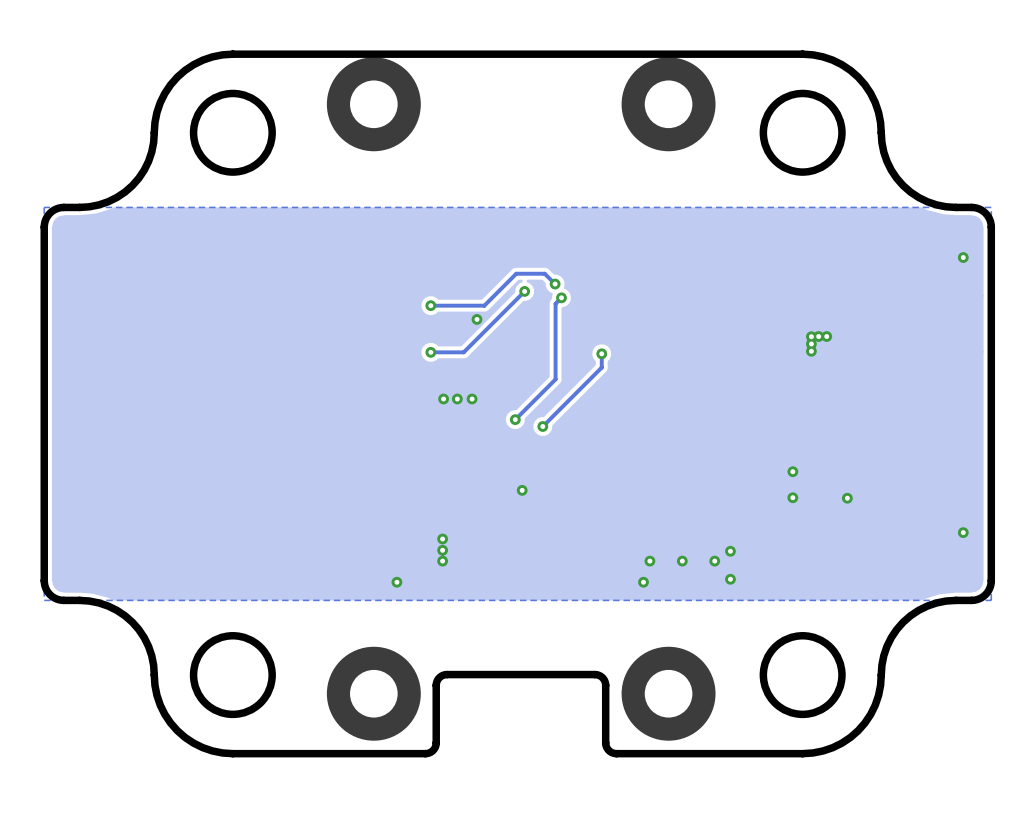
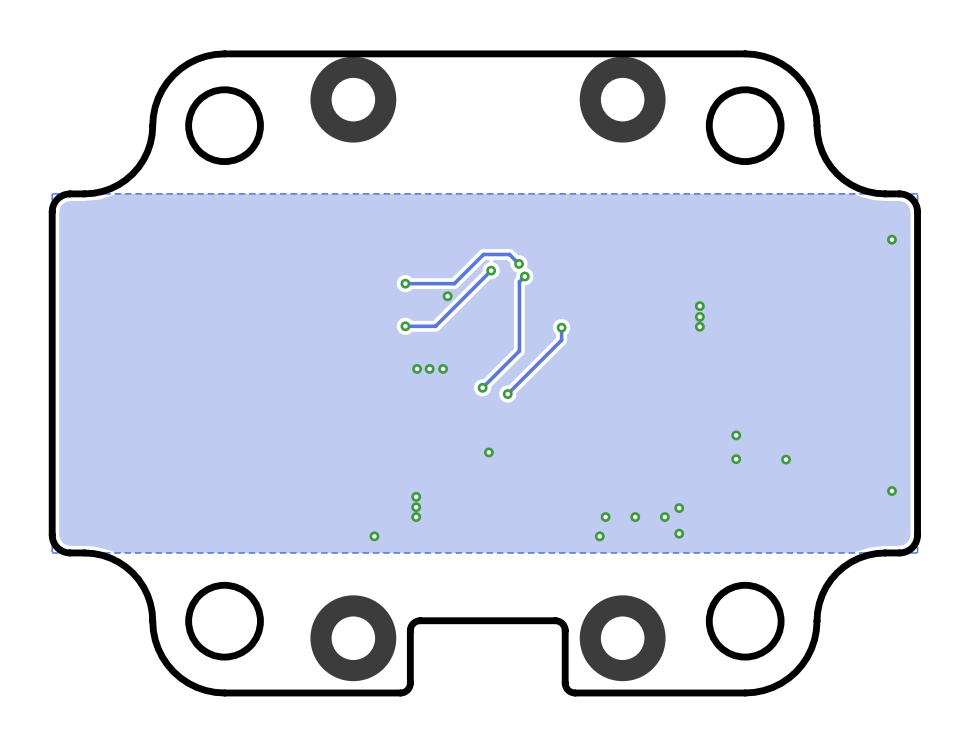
via: none -> (699, 306)
via: (811, 336) -> none
via: (818, 336) -> none
via: (826, 336) -> none
via: none -> (699, 316)
via: (811, 343) -> none
via: (811, 351) -> none
via: none -> (699, 326)

